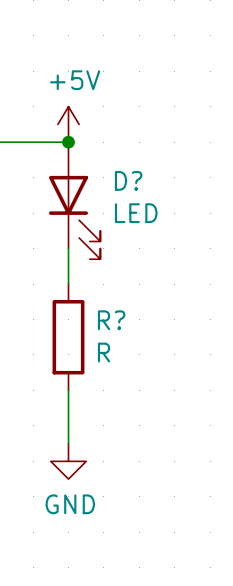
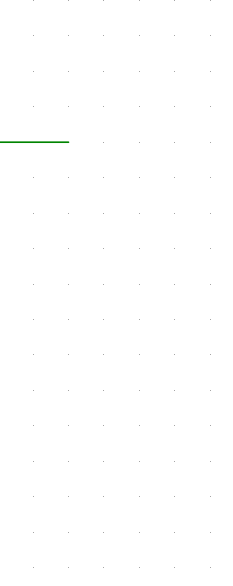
power symbol: +5V (68, 124) -> none
junction: (68, 142) -> none
D?: LED (74, 200) -> none
wire: (68, 248) (68, 284) -> none
R?: R (68, 337) -> none
wire: (68, 390) (68, 443) -> none
power symbol: GND (68, 461) -> none

